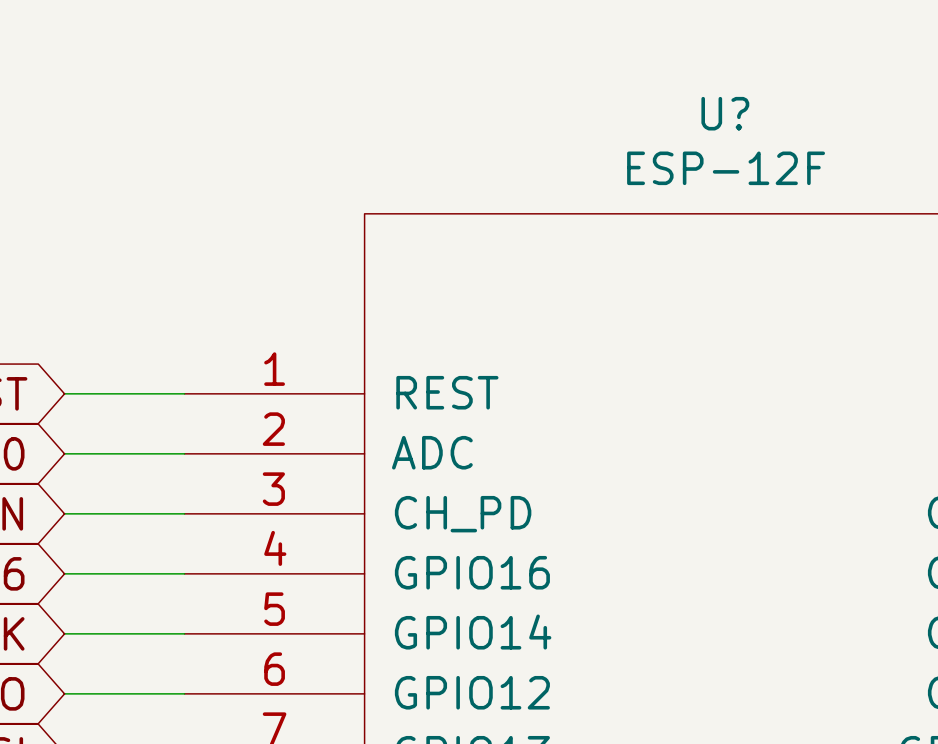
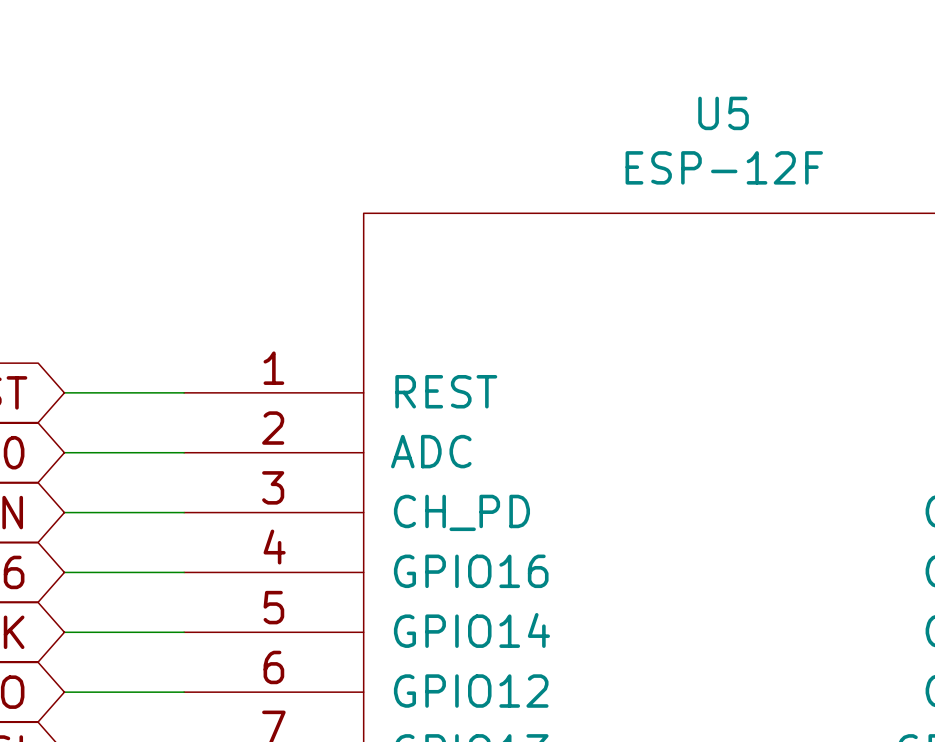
U? name: U? (725, 113) -> U5 (723, 113)

